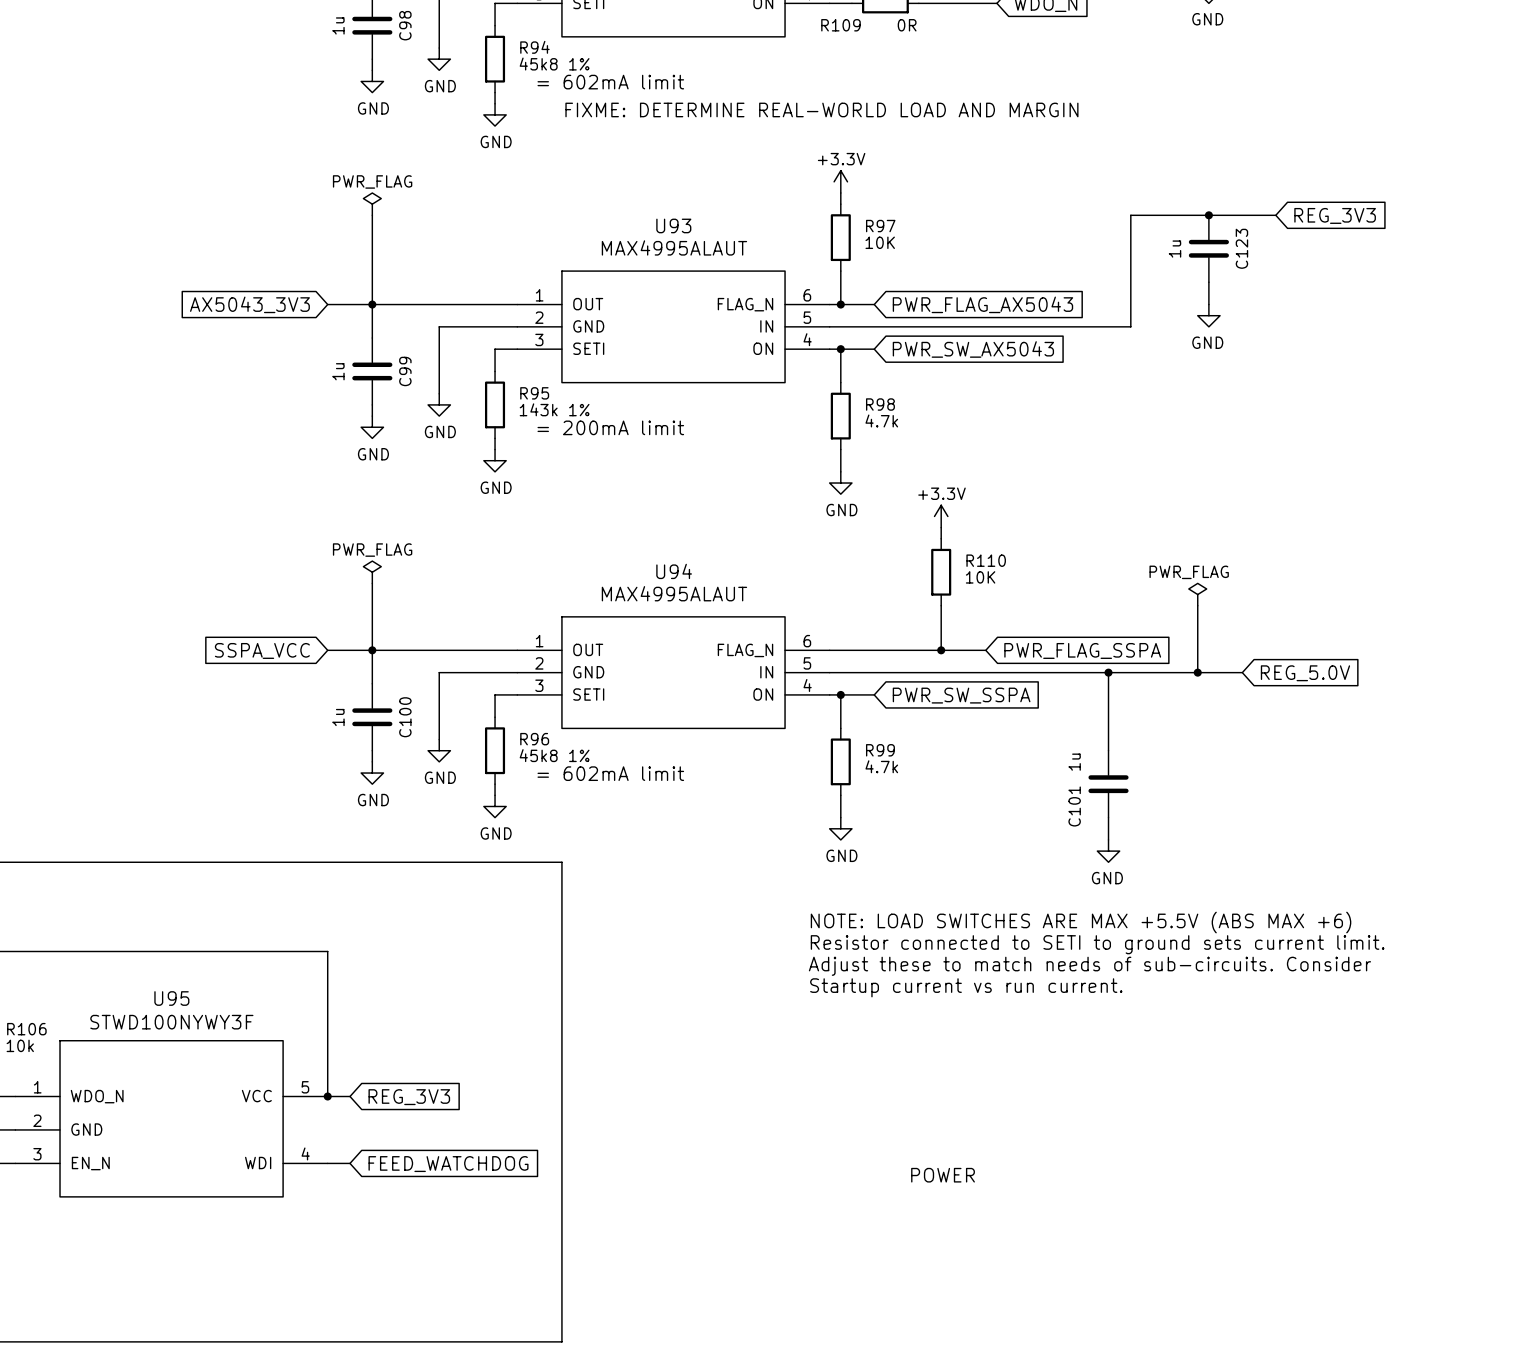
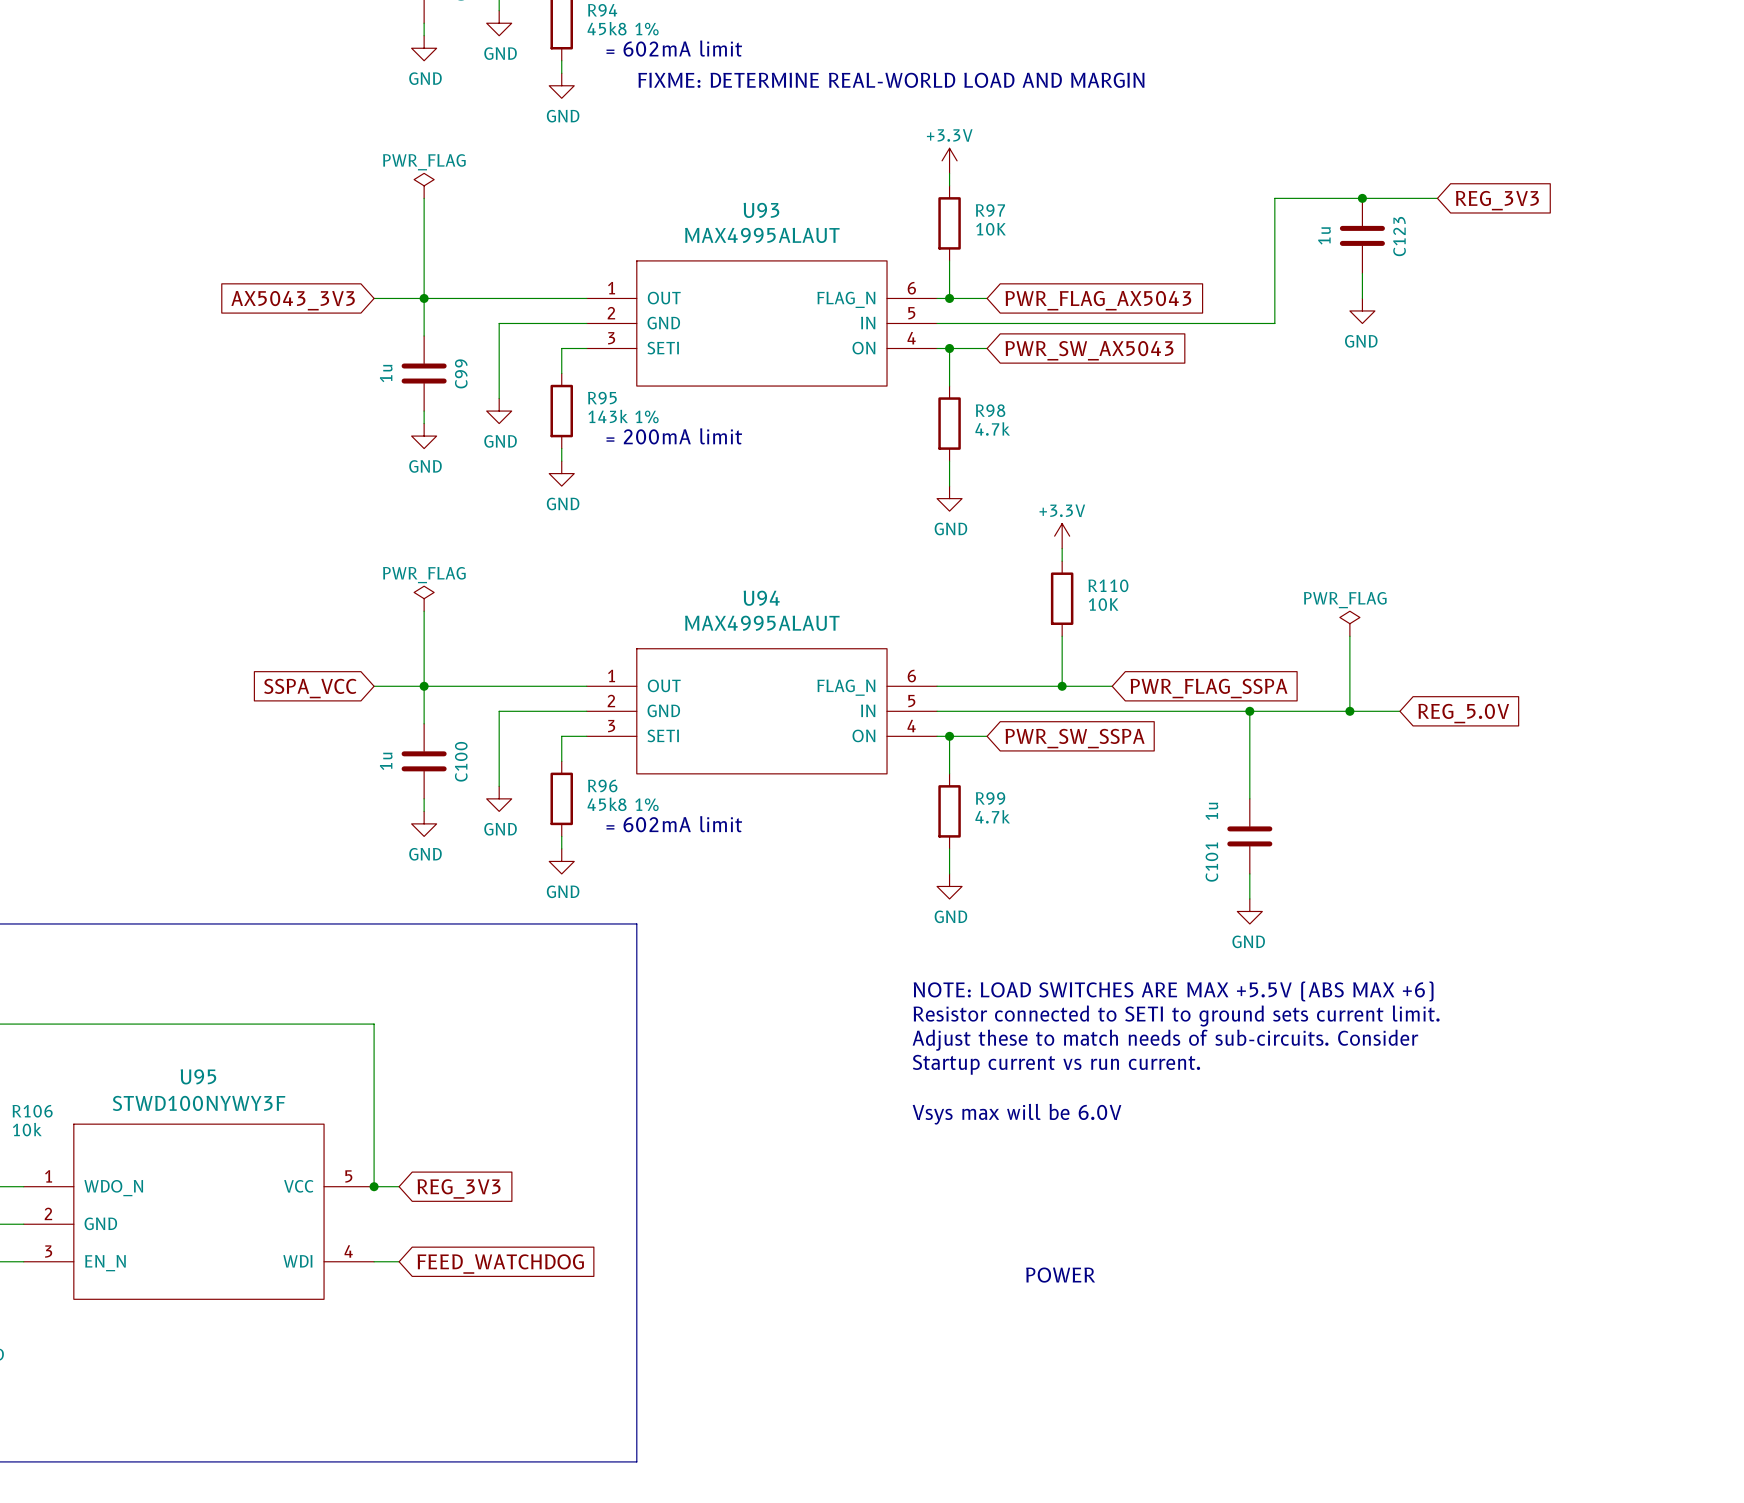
text: none -> Vsys max will be 6.0V (1017, 1114)

